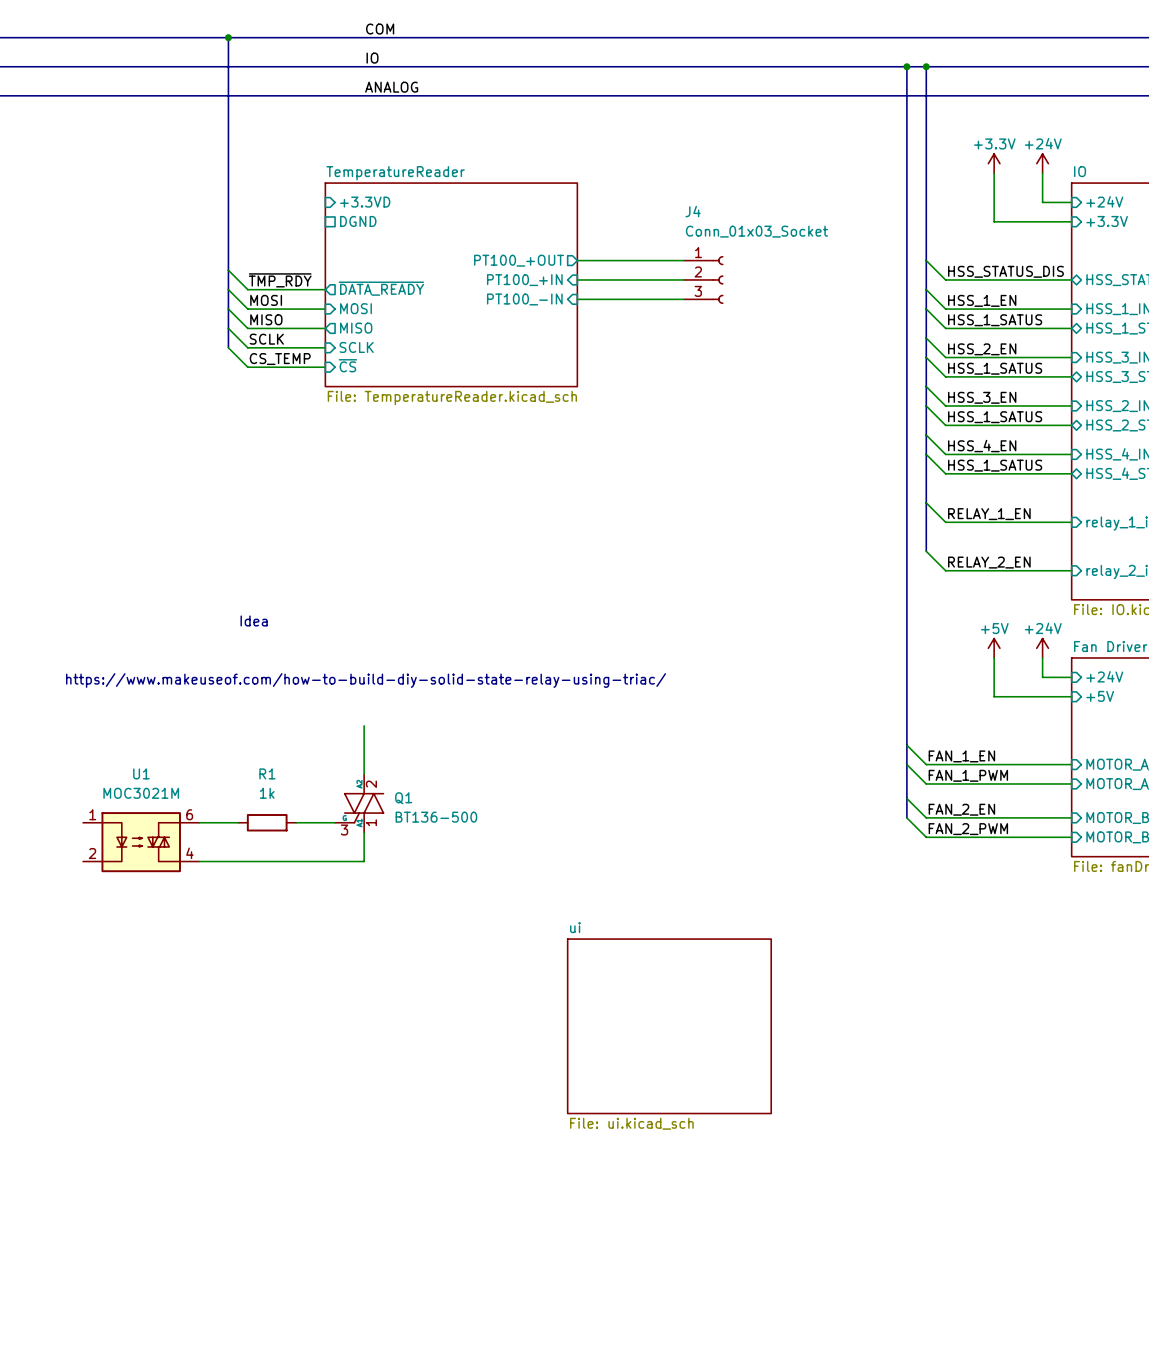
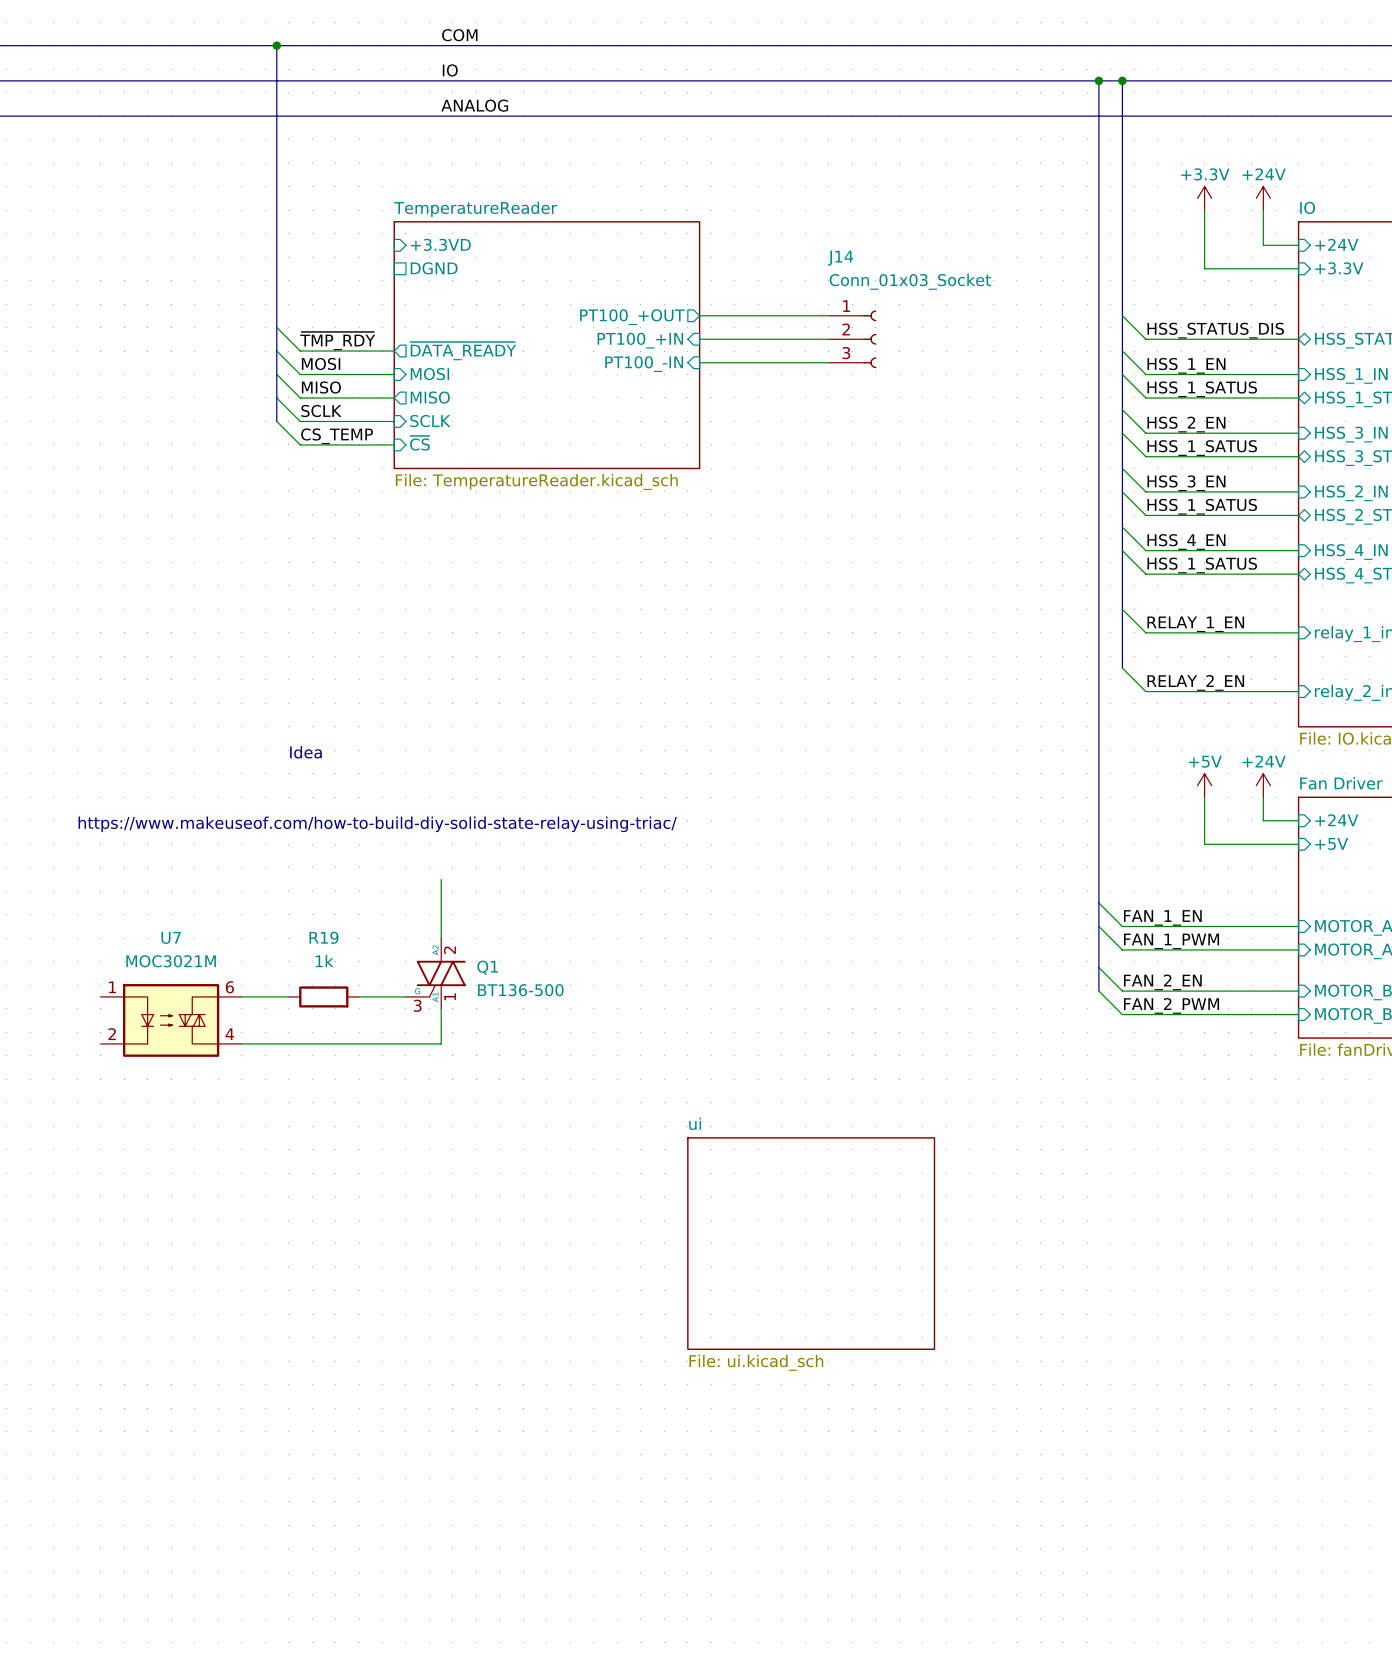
J4 name: J4 (693, 211) -> J14 (840, 258)
U1 name: U1 (141, 773) -> U7 (171, 937)
R1 name: R1 (267, 773) -> R19 (324, 937)

